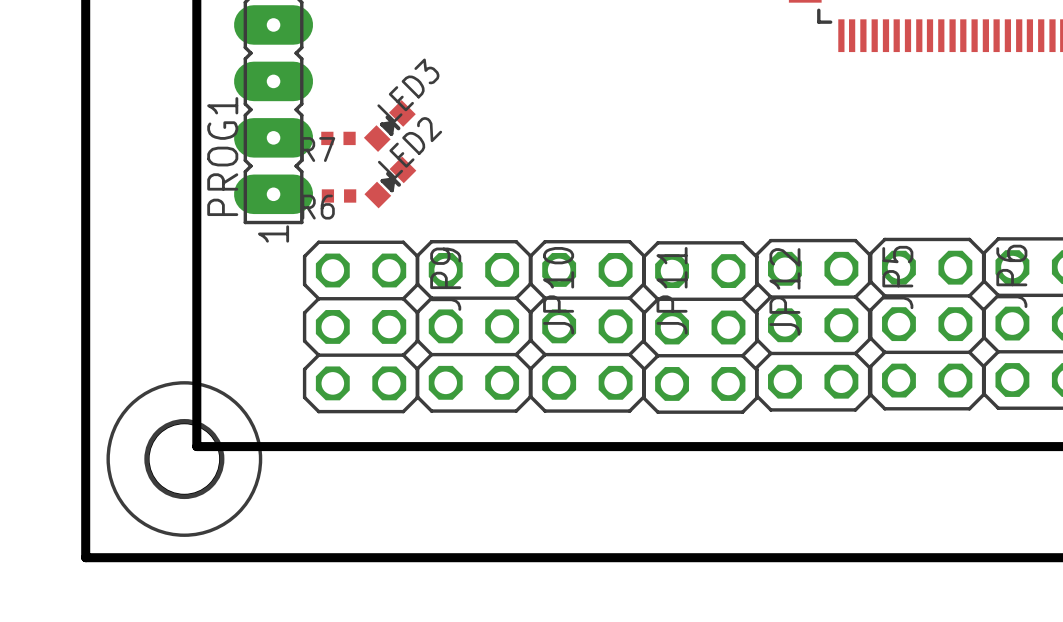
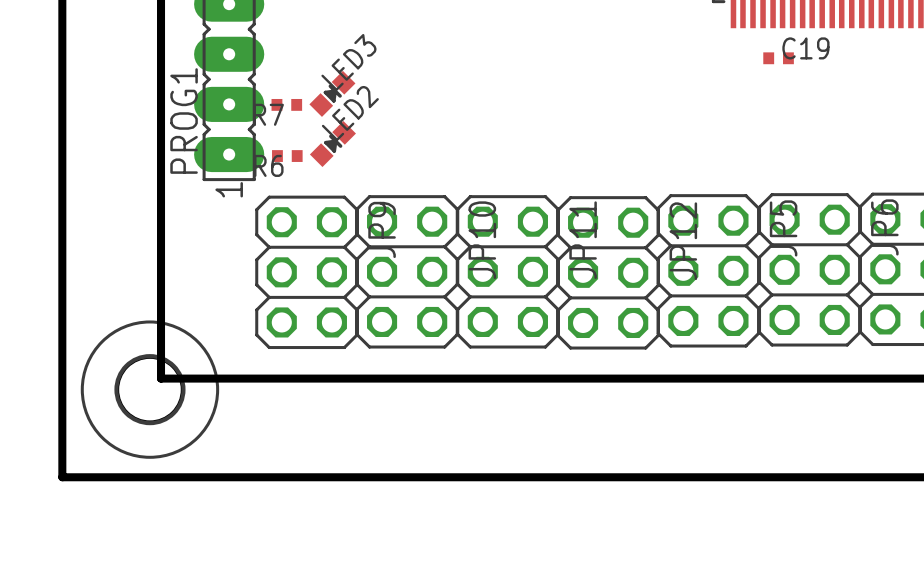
C19: none -> (778, 58)

